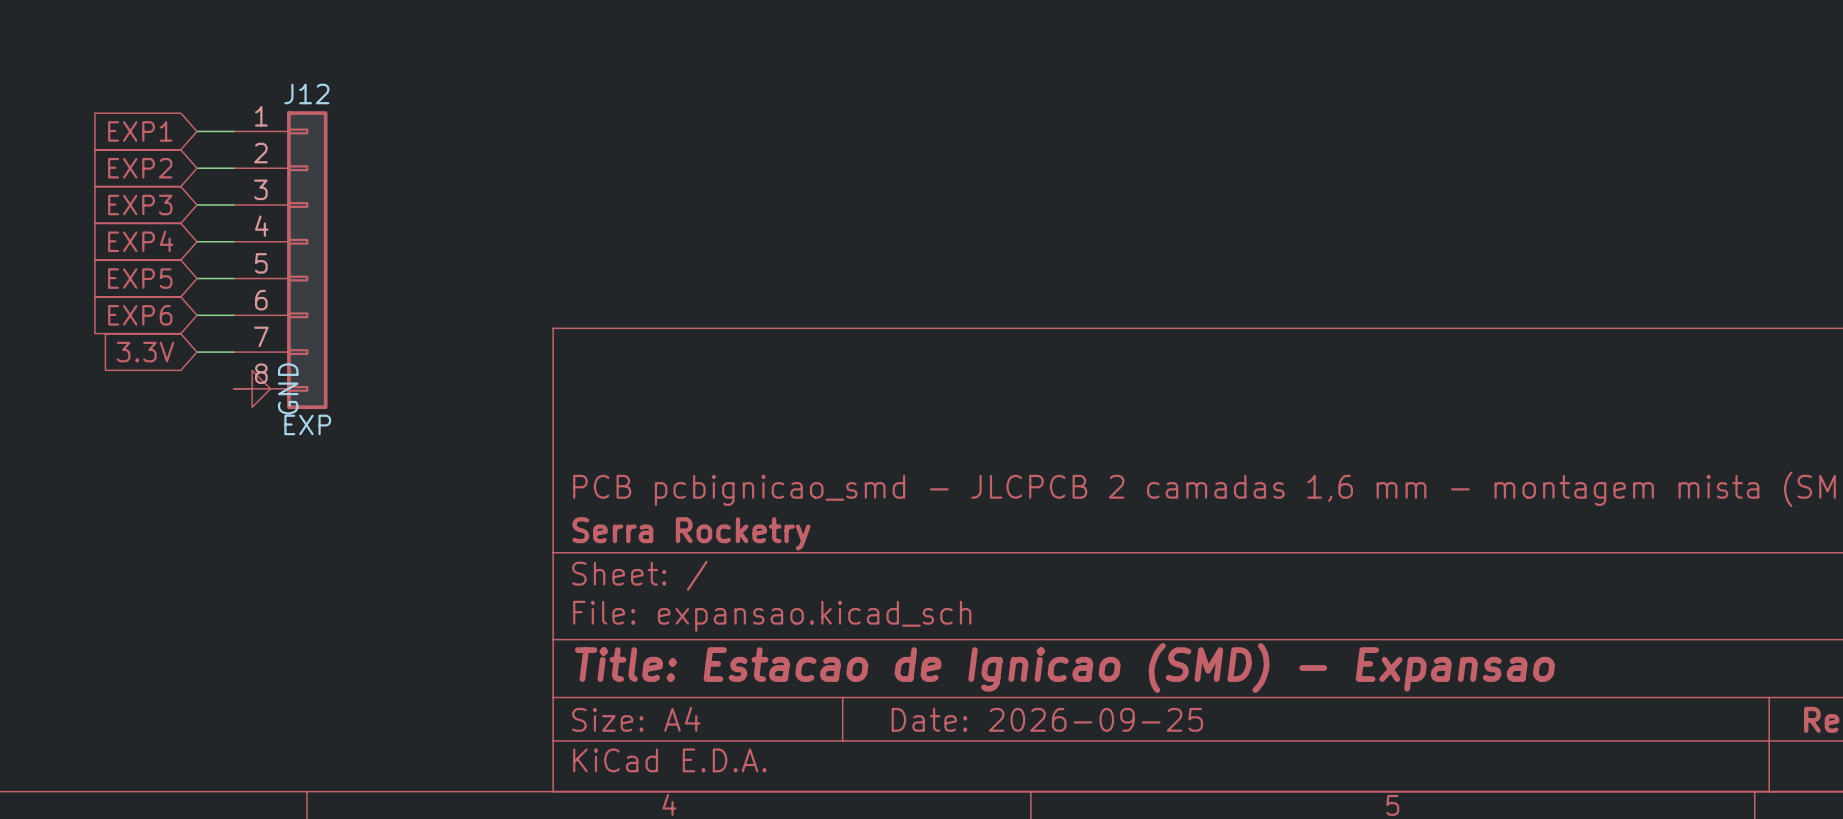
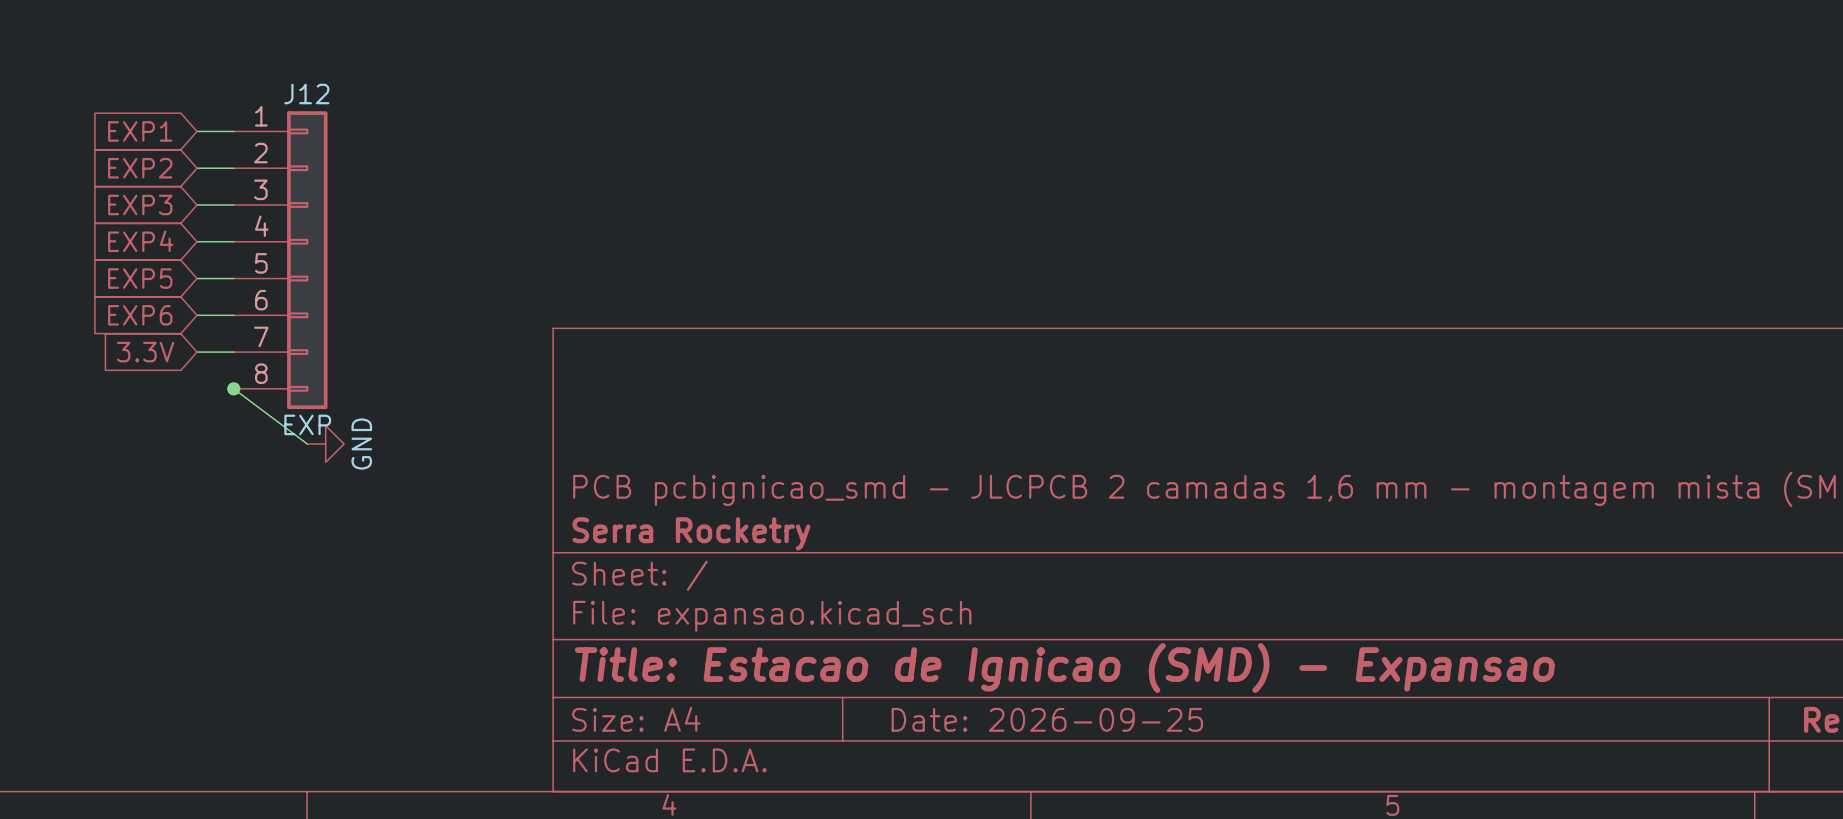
wire: none -> (233, 388) (307, 444)
junction: none -> (233, 388)
power symbol position: GND (252, 388) -> GND (325, 444)

